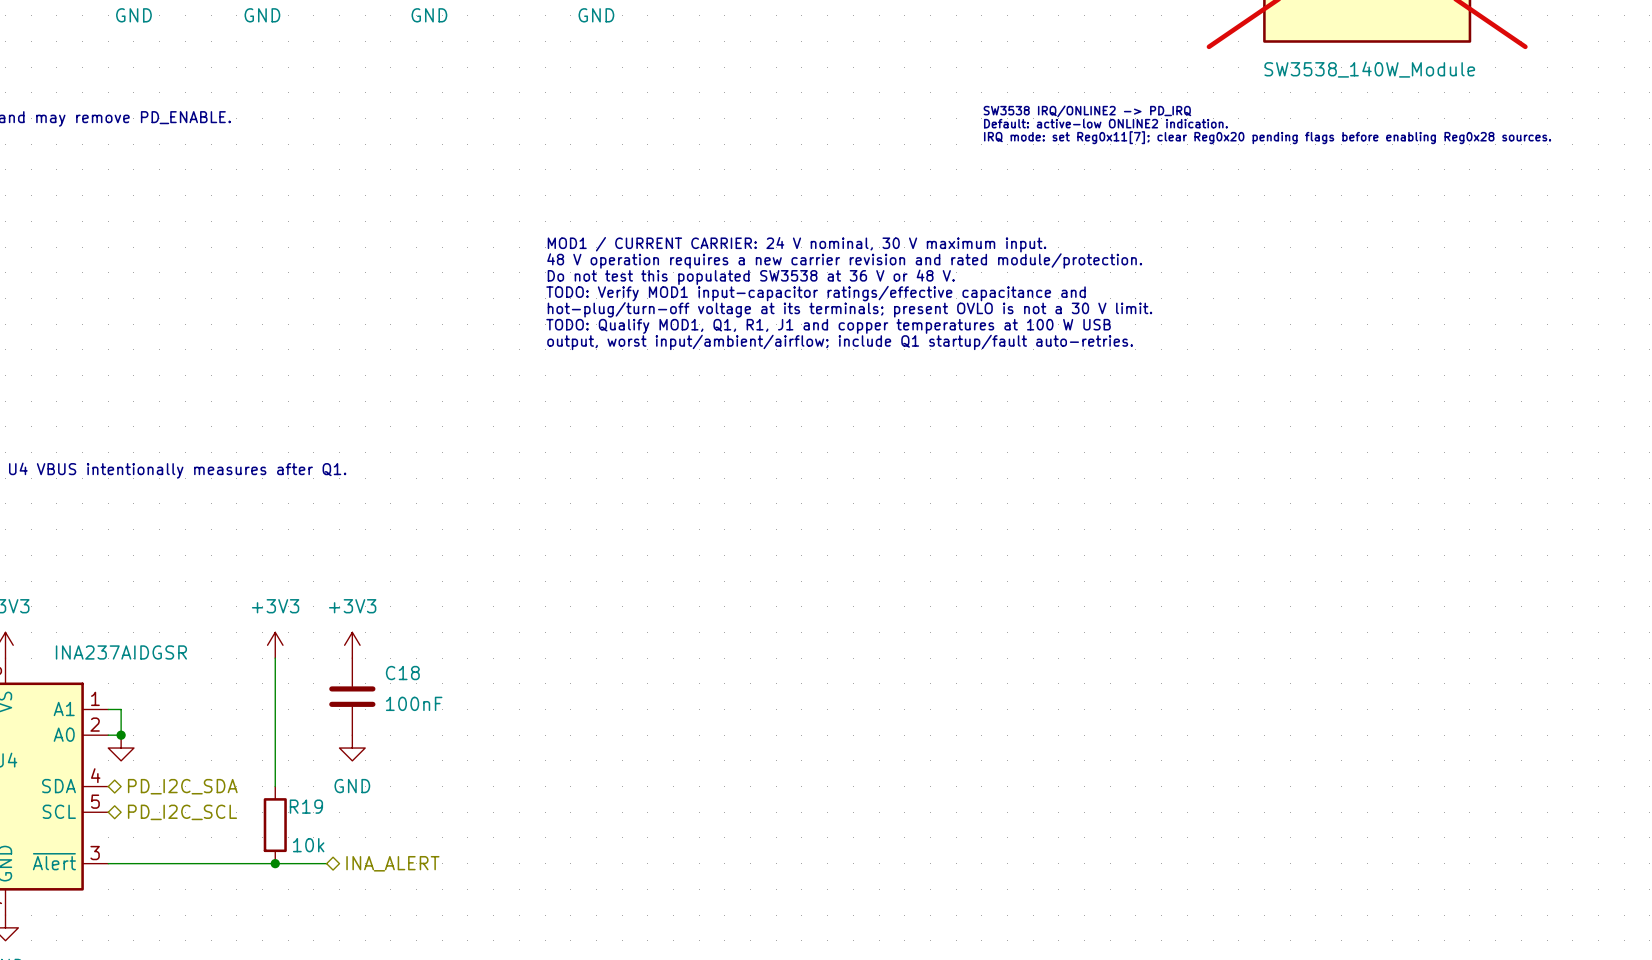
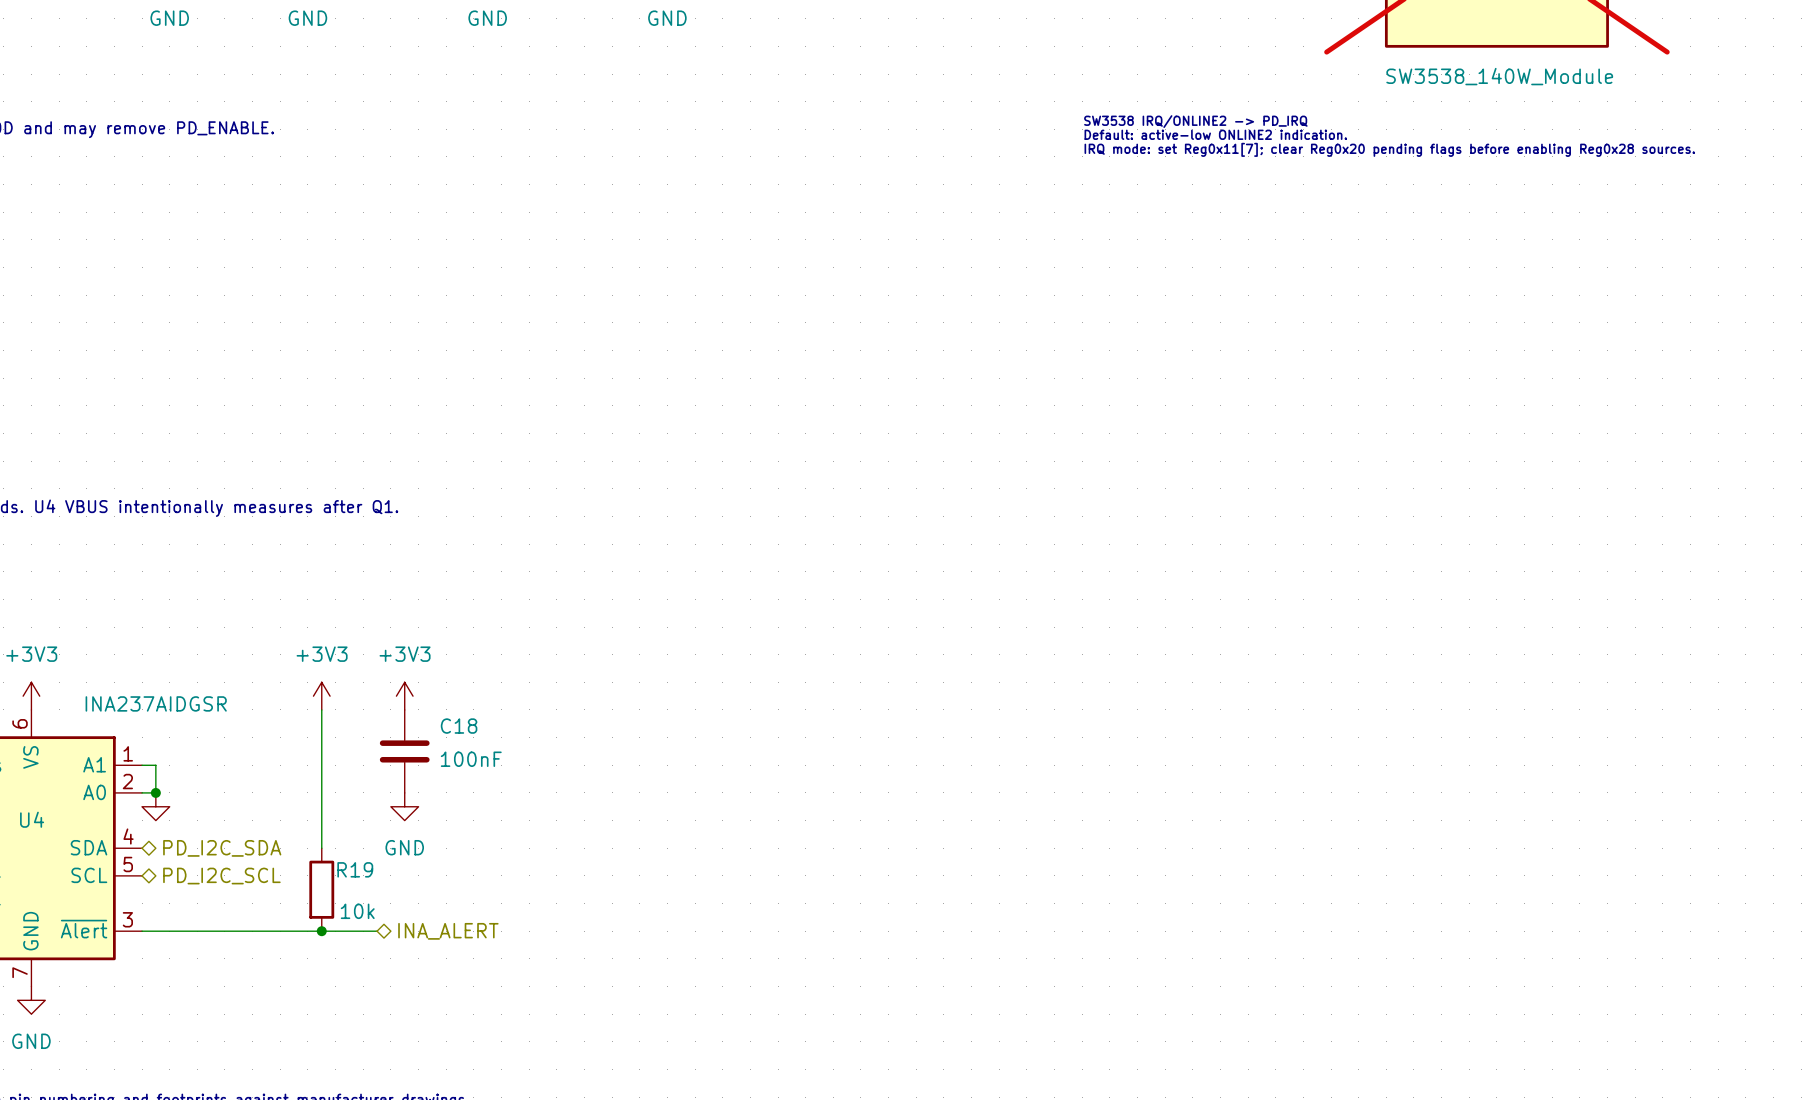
text: MOD1 / CURRENT CARRIER: 24 V nominal, 30 V maximum input. (796, 244) -> none
text: 48 V operation requires a new carrier revision and rated module/protection. (844, 260) -> none
text: Do not test this populated SW3538 at 36 V or 48 V. (751, 277) -> none
text: TODO: Verify MOD1 input-capacitor ratings/effective capacitance and (816, 293) -> none
text: hot-plug/turn-off voltage at its terminals; present OVLO is not a 30 V limit. (849, 309) -> none
text: TODO: Qualify MOD1, Q1, R1, J1 and copper temperatures at 100 W USB (828, 326) -> none
text: output, worst input/ambient/airflow; include Q1 startup/fault auto-retries. (840, 342) -> none

